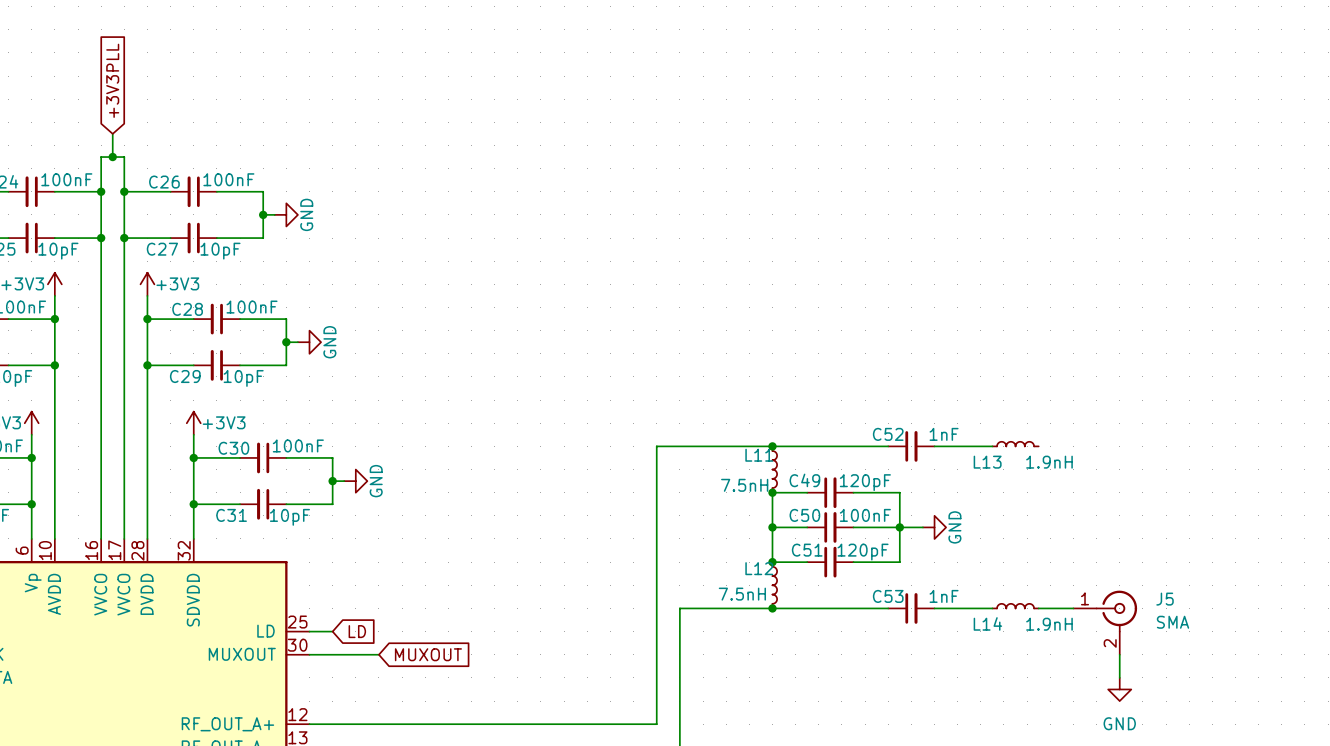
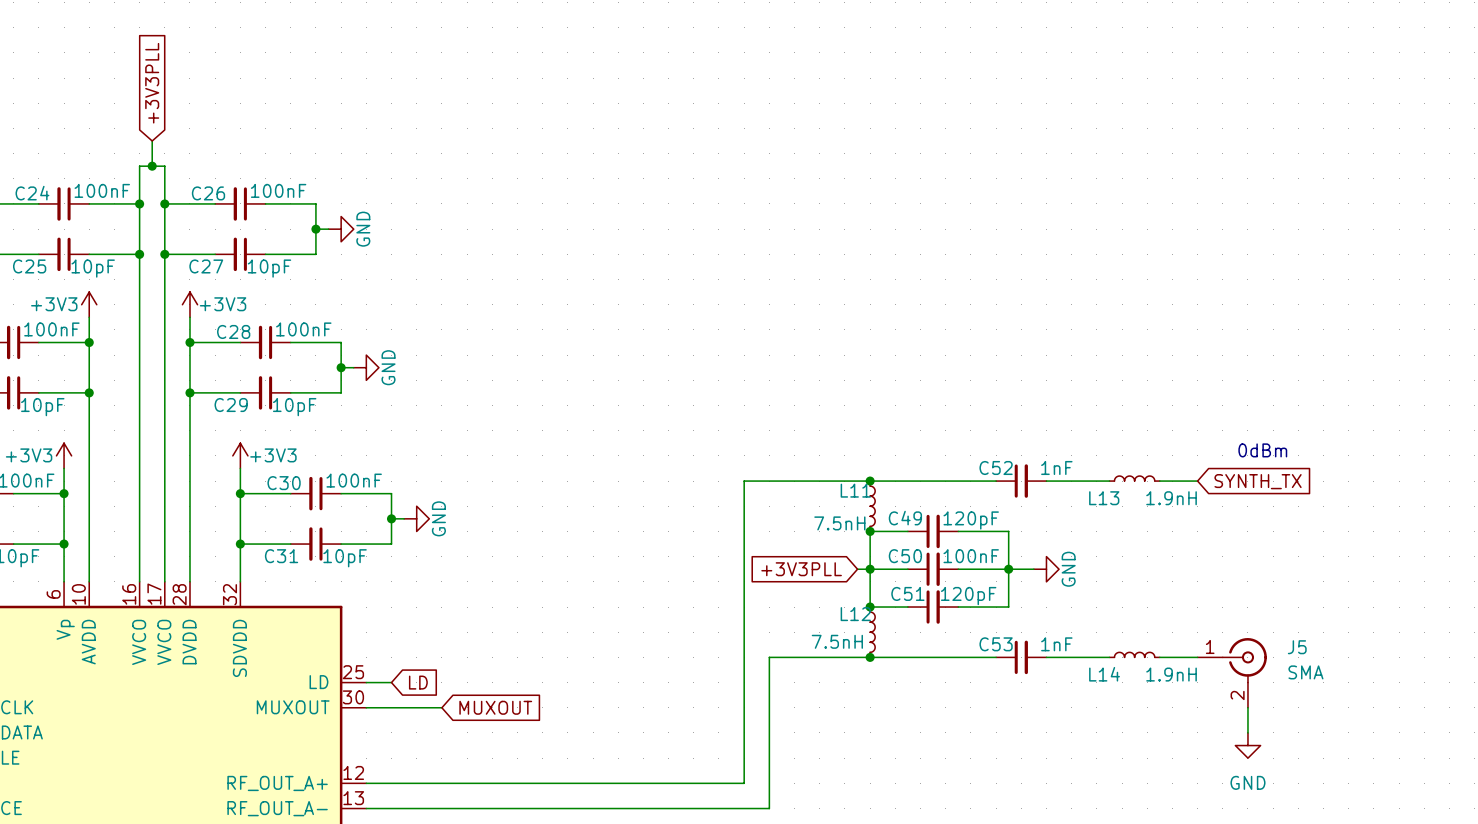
text: none -> 0dBm (1262, 450)
wire: none -> (1159, 481) (1197, 481)
global label: none -> SYNTH_TX (1258, 481)
global label: none -> +3V3PLL (801, 569)
wire: none -> (857, 569) (870, 569)

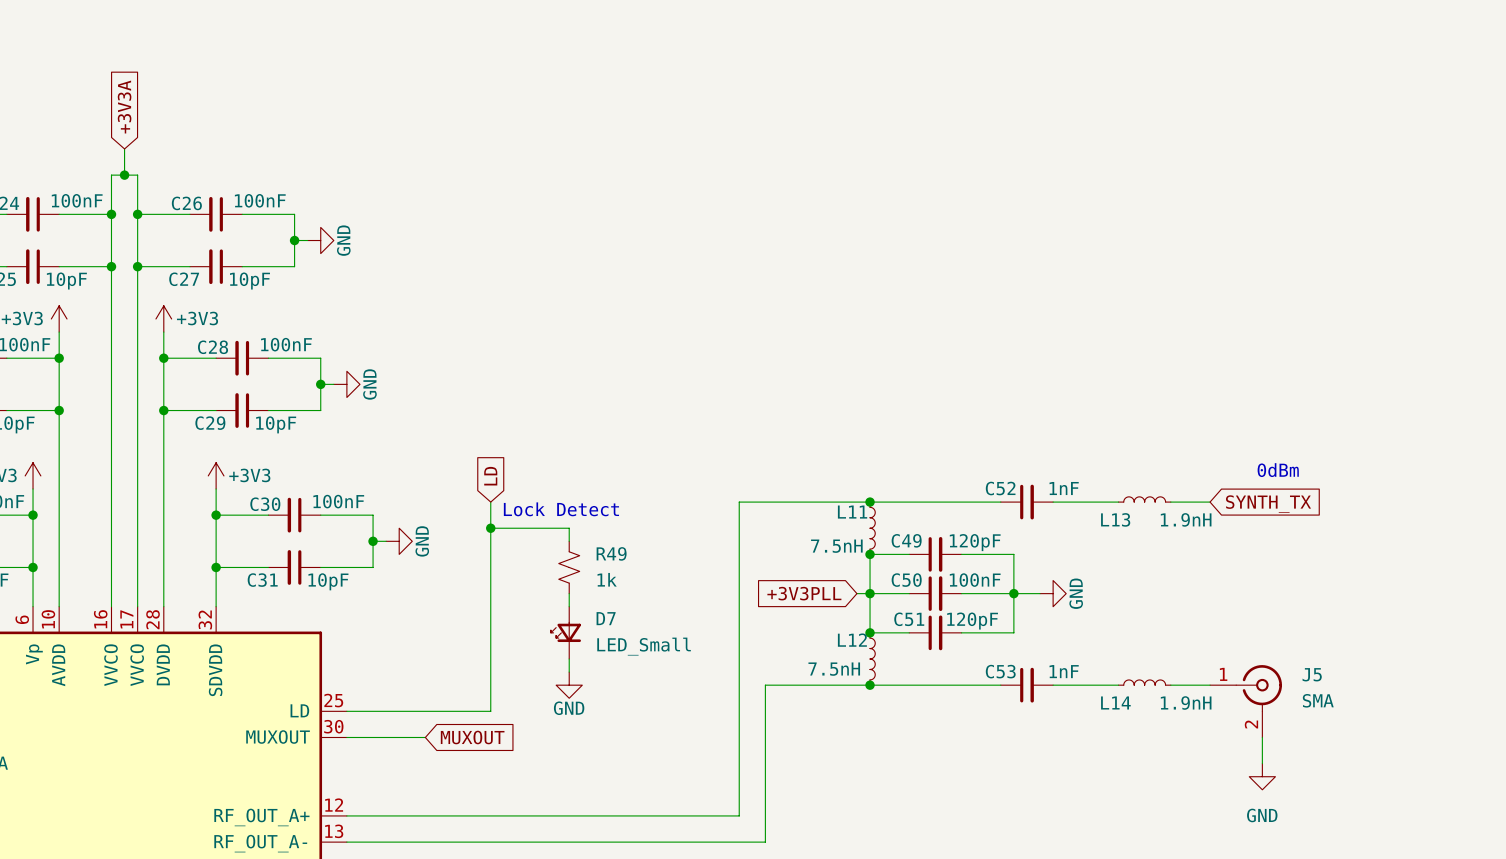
global label: +3V3PLL (152, 83) -> +3V3A (124, 107)
wire: none -> (490, 502) (490, 711) (373, 711)
text: none -> Lock Detect (561, 509)
wire: none -> (490, 528) (569, 528) (569, 541)
junction: none -> (490, 528)
R49: none -> 1k (569, 567)
wire: none -> (569, 593) (569, 606)
D7: none -> LED_Small (565, 632)
wire: none -> (569, 659) (569, 672)
power symbol: none -> GND (569, 685)
global label rotation: 0° (418, 682) -> 90° counterclockwise (490, 476)
global label position: LD (418, 682) -> LD (490, 476)

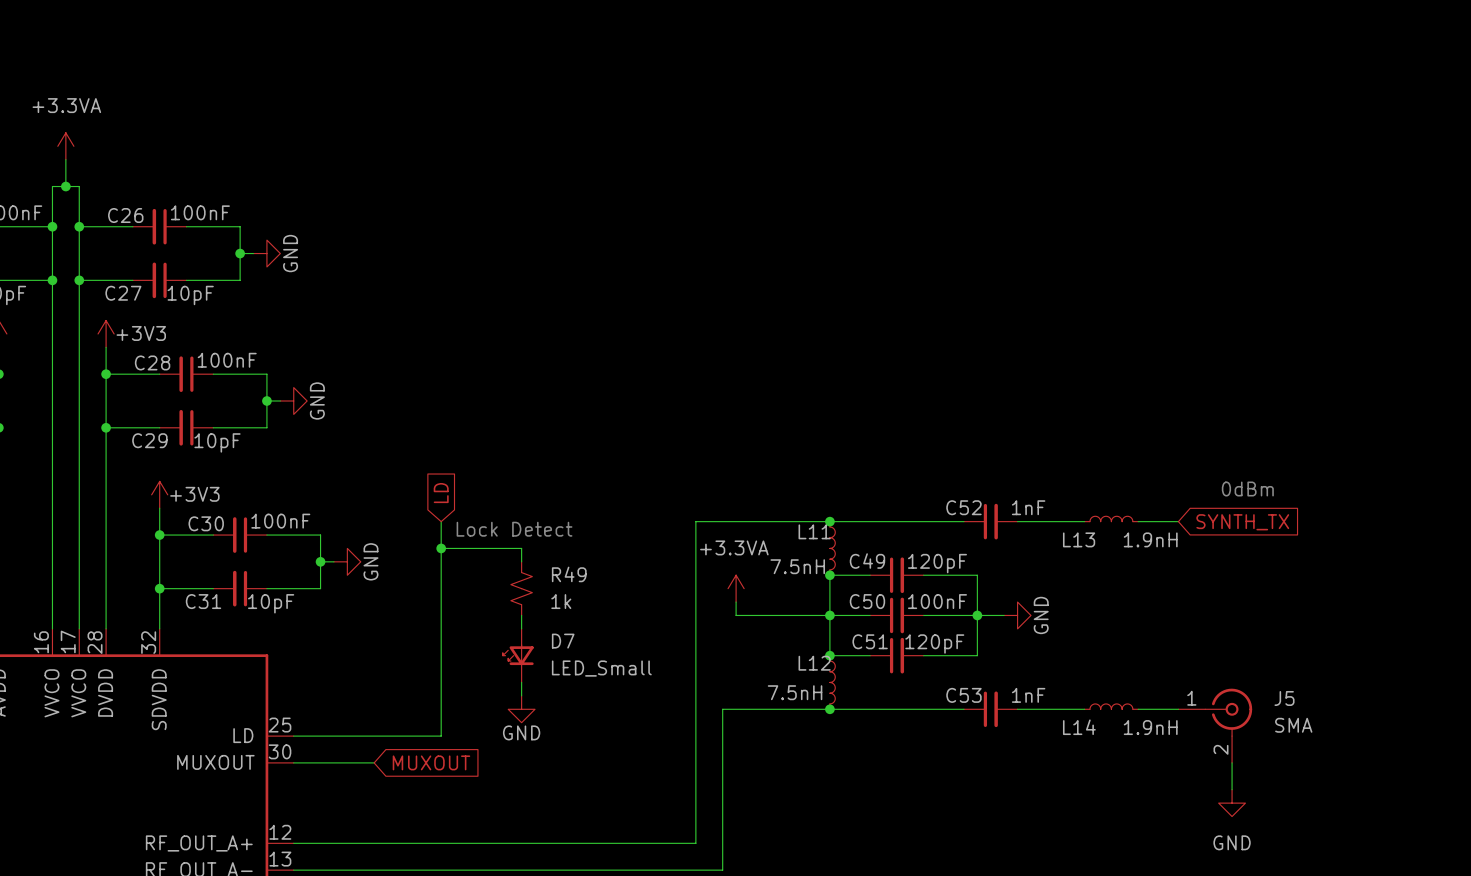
global label: +3V3A (124, 107) -> none
power symbol: none -> +3.3VA (65, 146)
power symbol: none -> +3.3VA (736, 588)
wire: none -> (736, 602) (736, 615) (816, 615)
global label: +3V3PLL (804, 593) -> none

